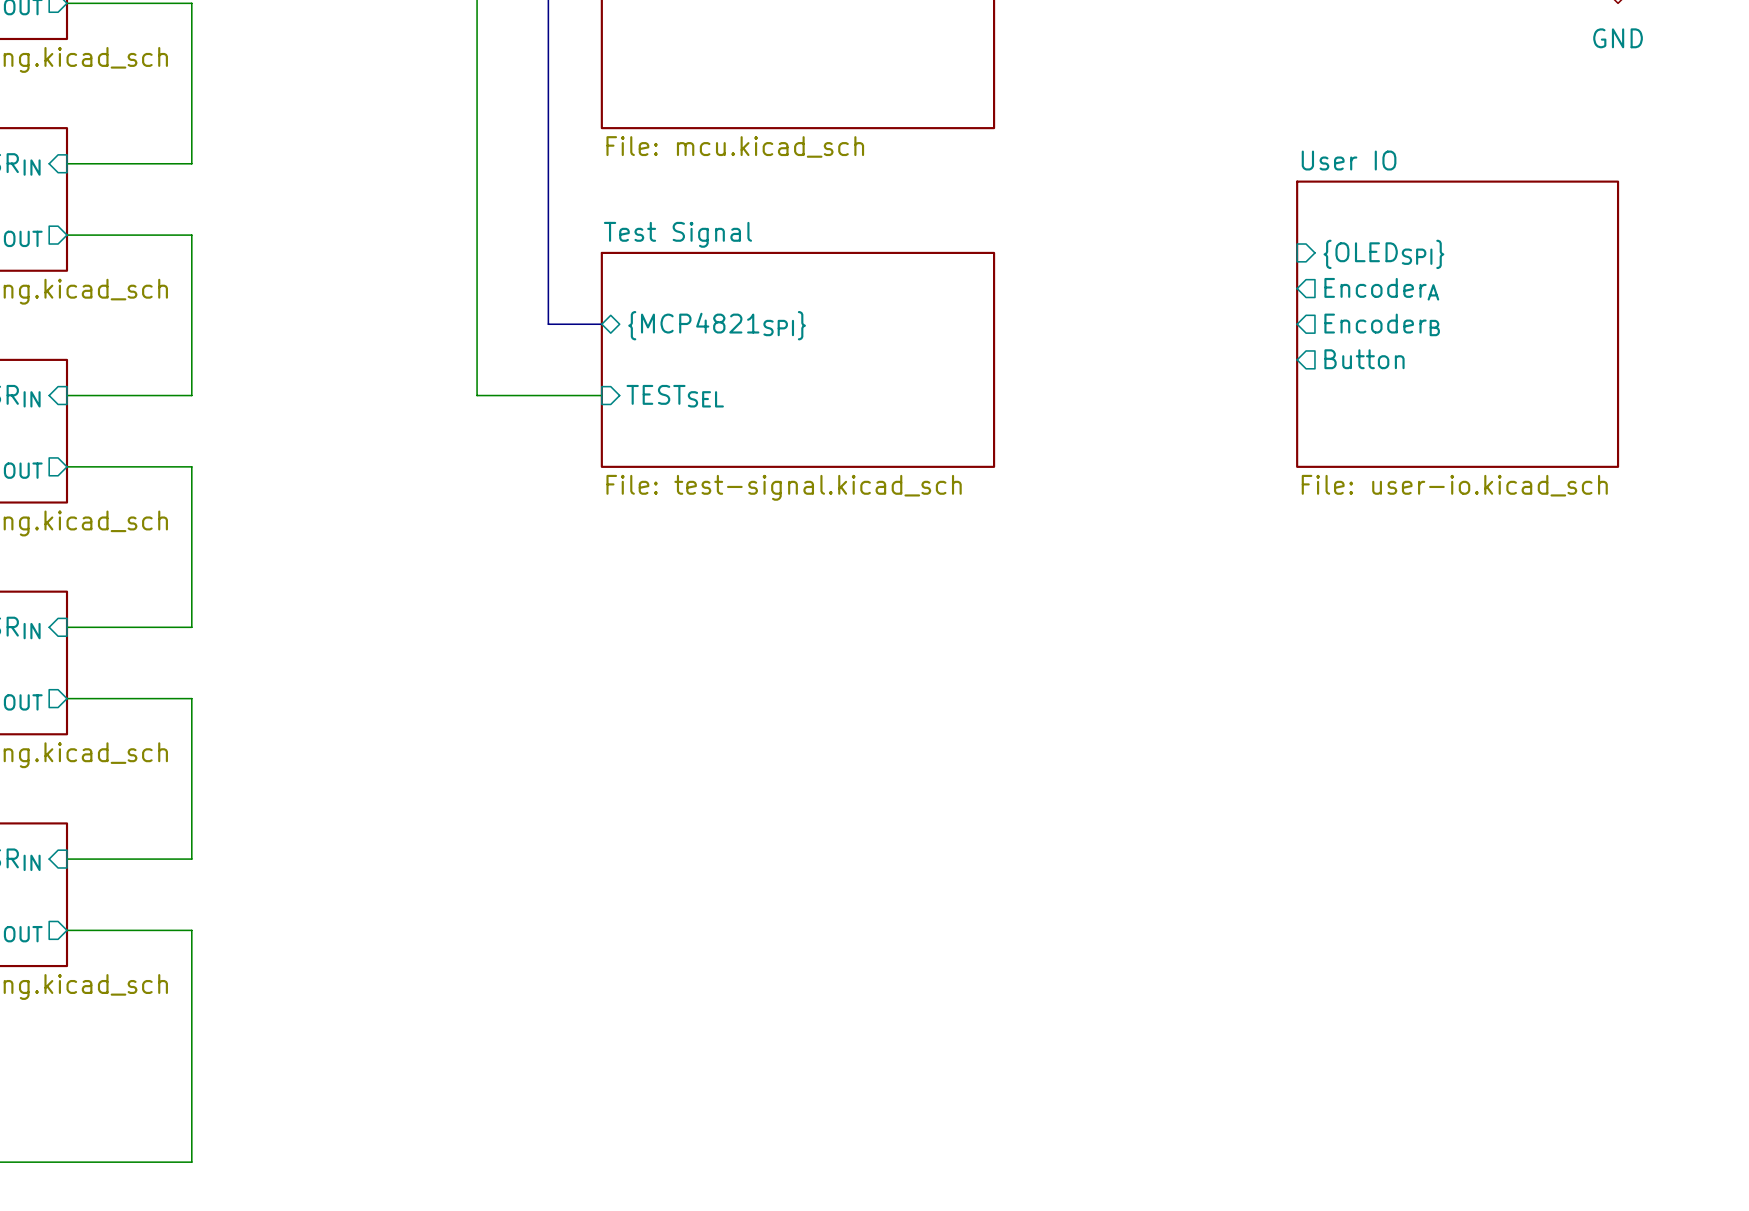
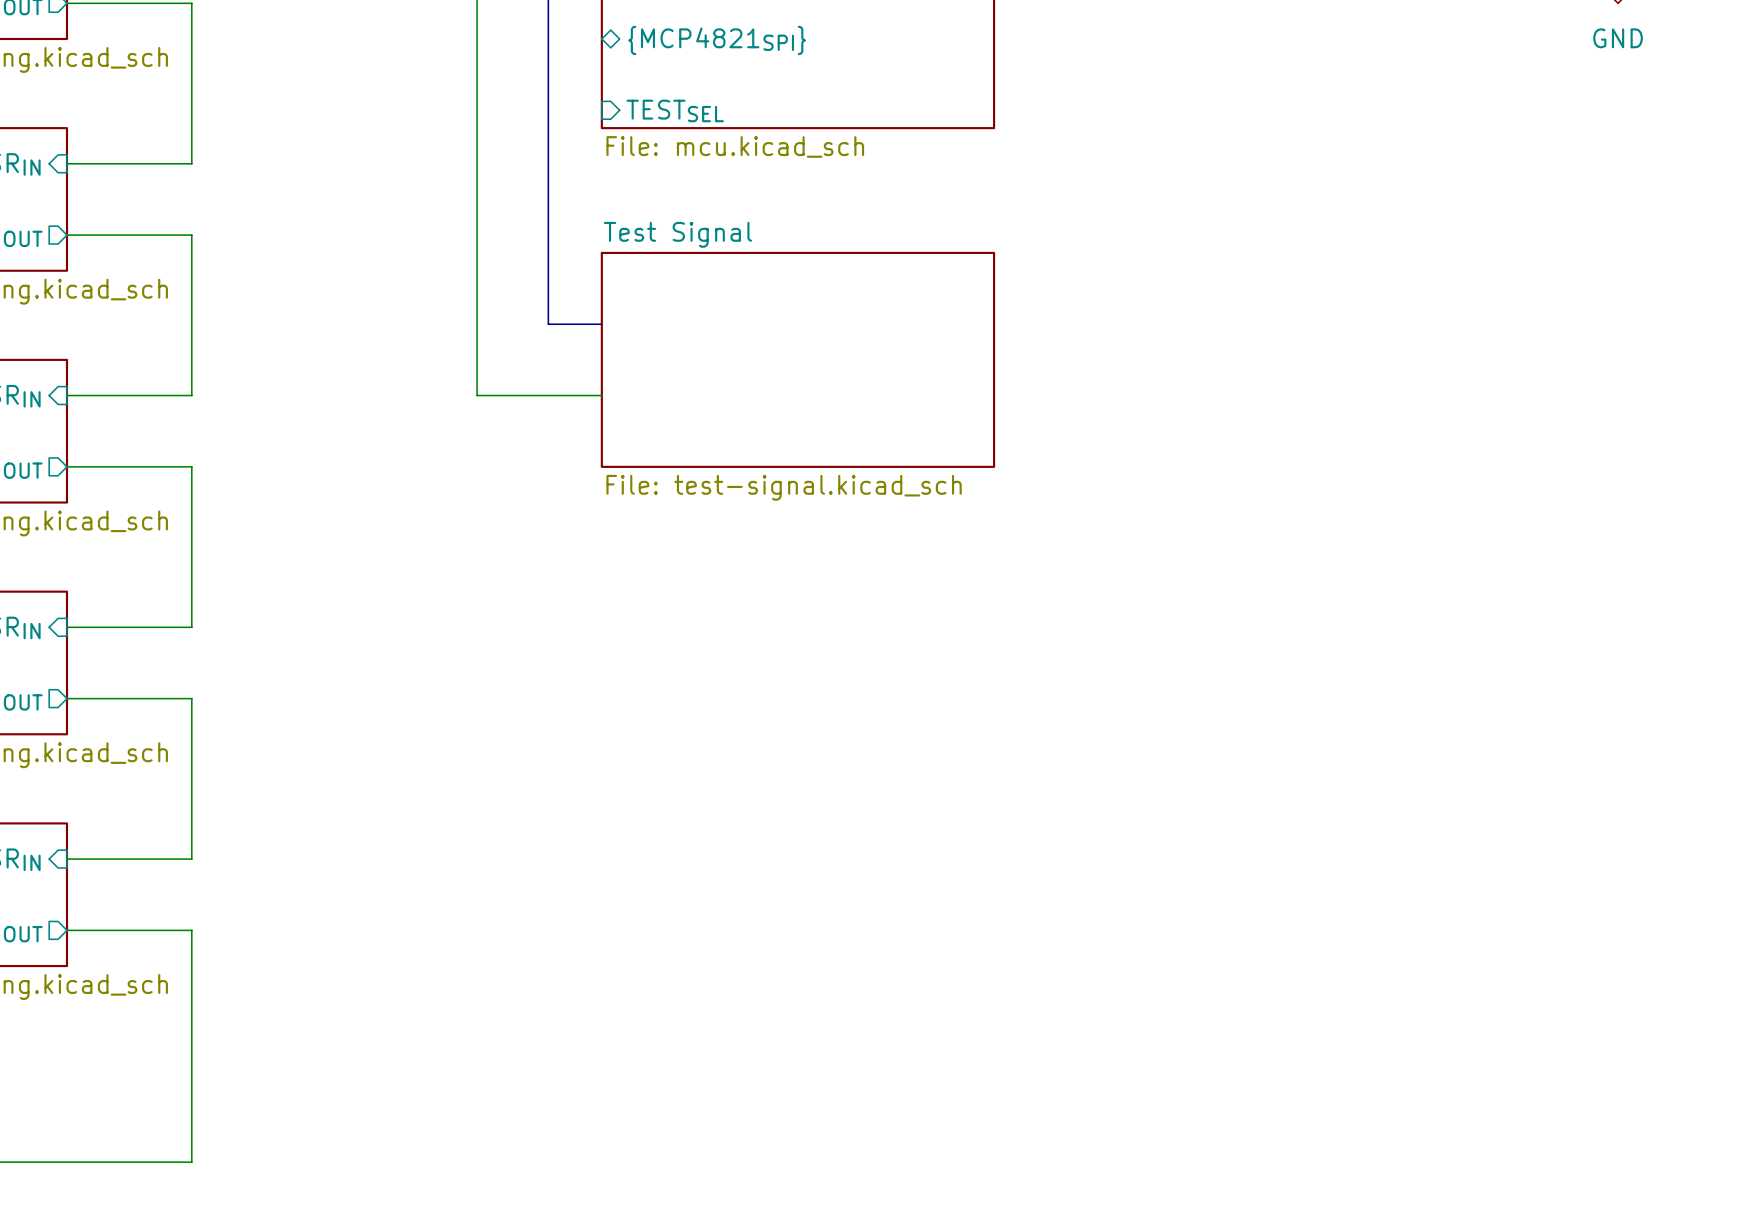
sheet pin: {OLEDSPI} (1383, 254) -> none
sheet pin: EncoderA (1381, 289) -> none
sheet pin: EncoderB (1382, 324) -> none
sheet User IO: File: user-io.kicad_sch (1457, 324) -> none
sheet pin position: {MCP4821SPI} (717, 325) -> {MCP4821SPI} (717, 40)
sheet pin: Button (1364, 359) -> none
sheet pin position: TESTSEL (675, 396) -> TESTSEL (675, 110)

